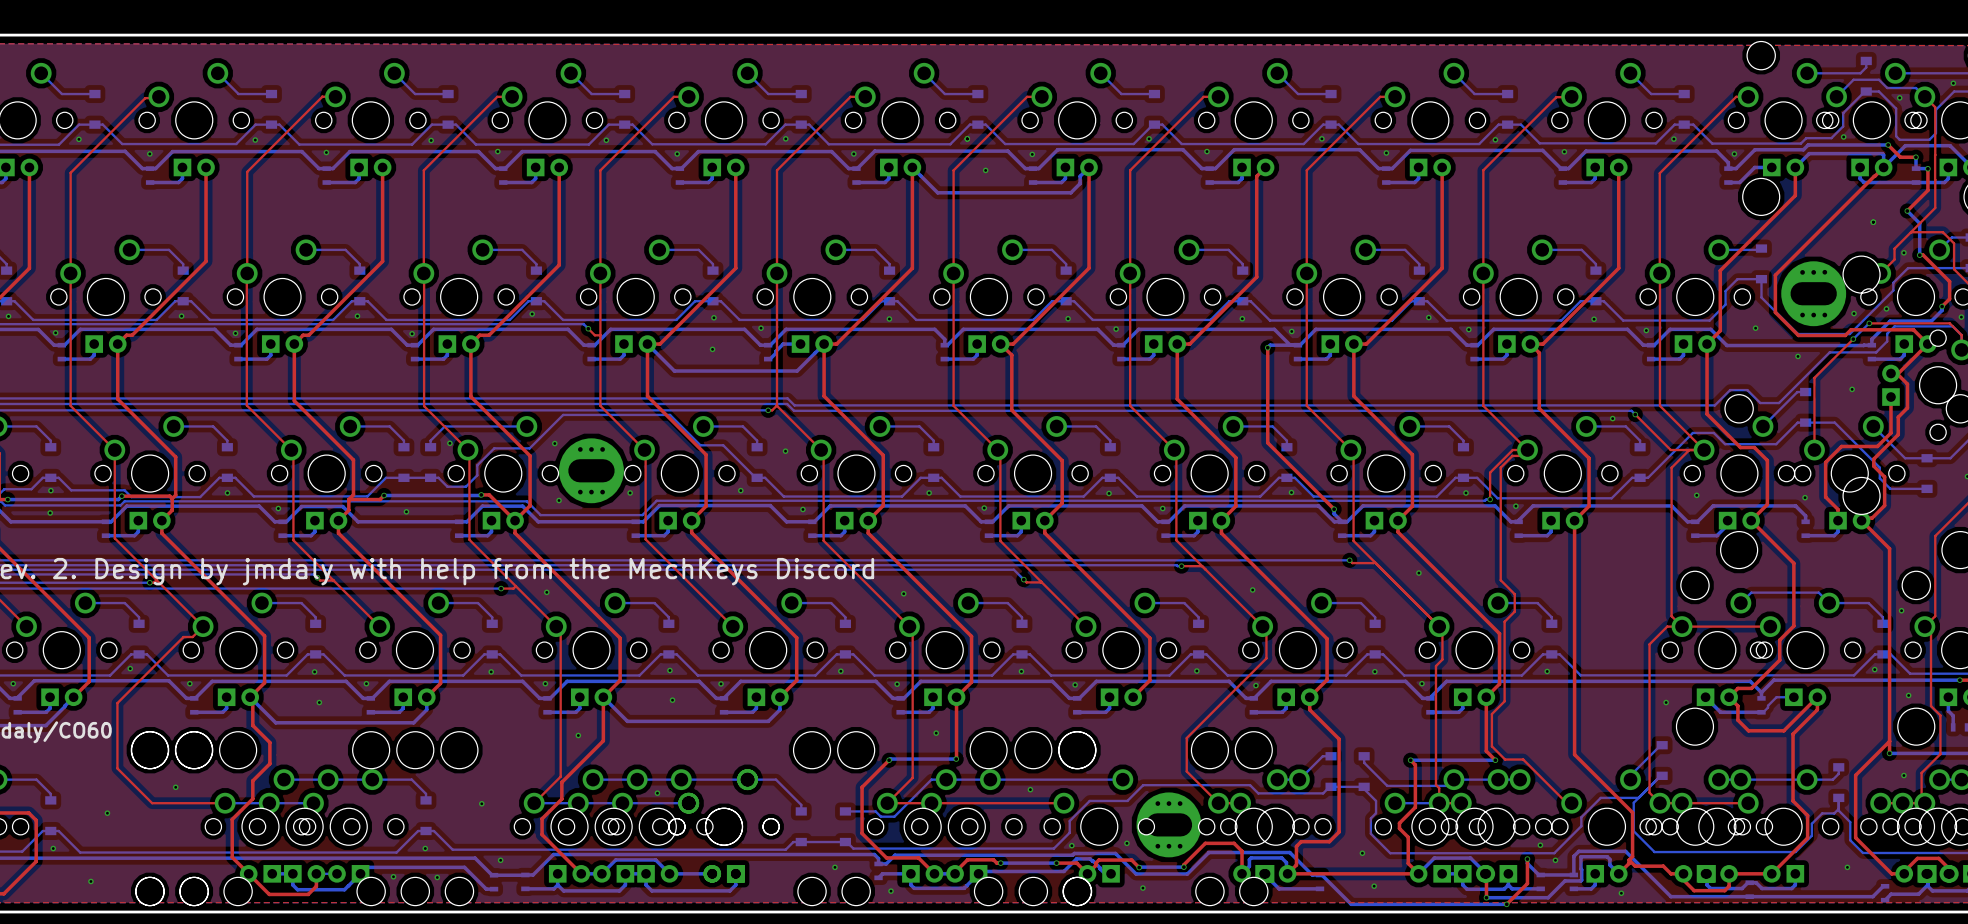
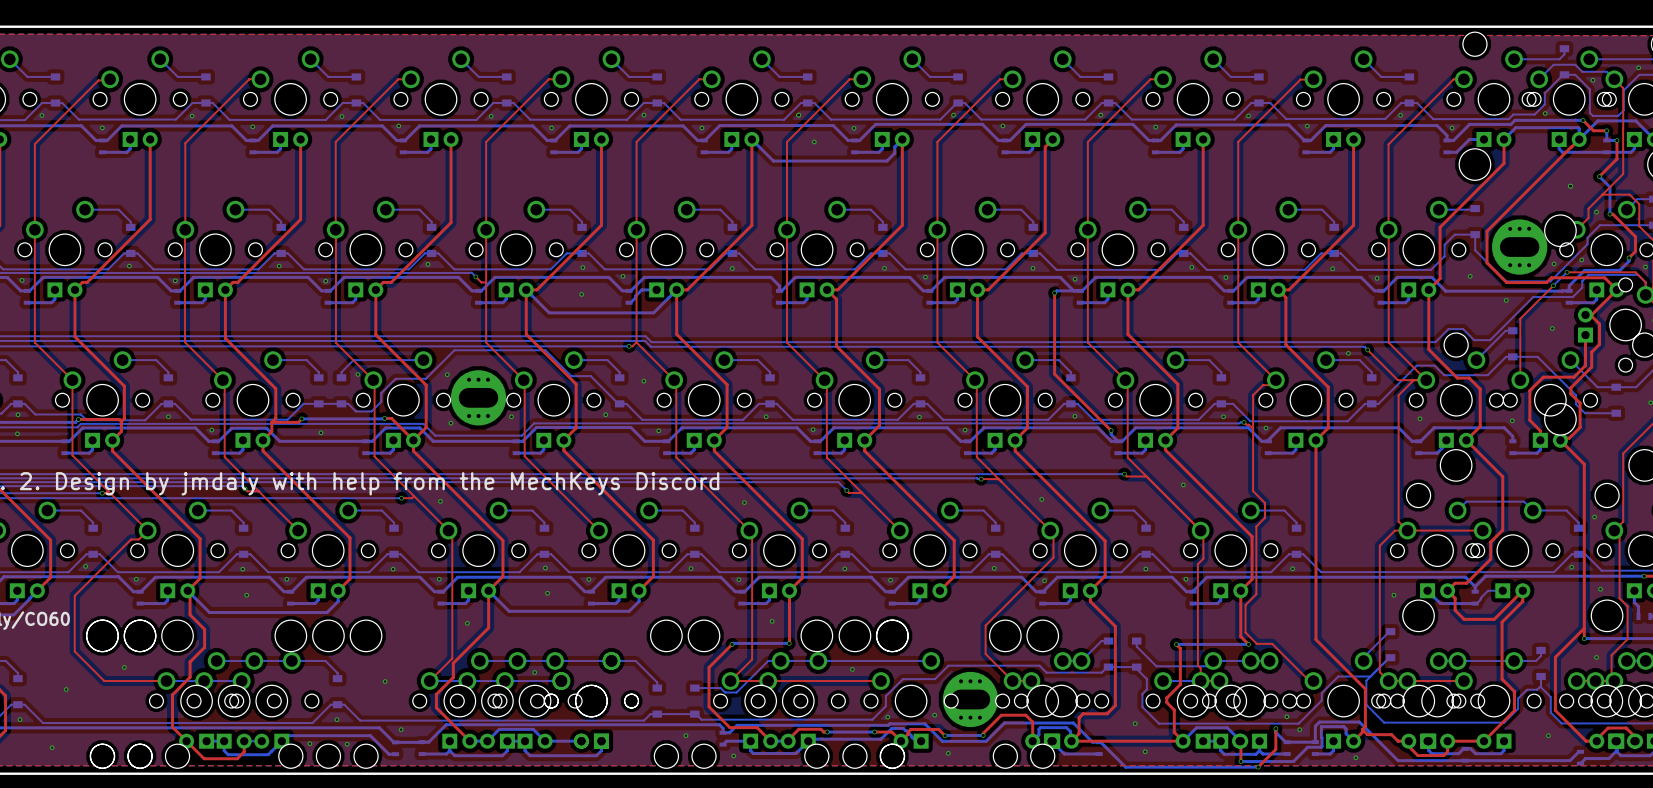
top track: (1527, 450) (1512, 450) (1490, 472) (1490, 499) -> (1253, 428) (1244, 422)

